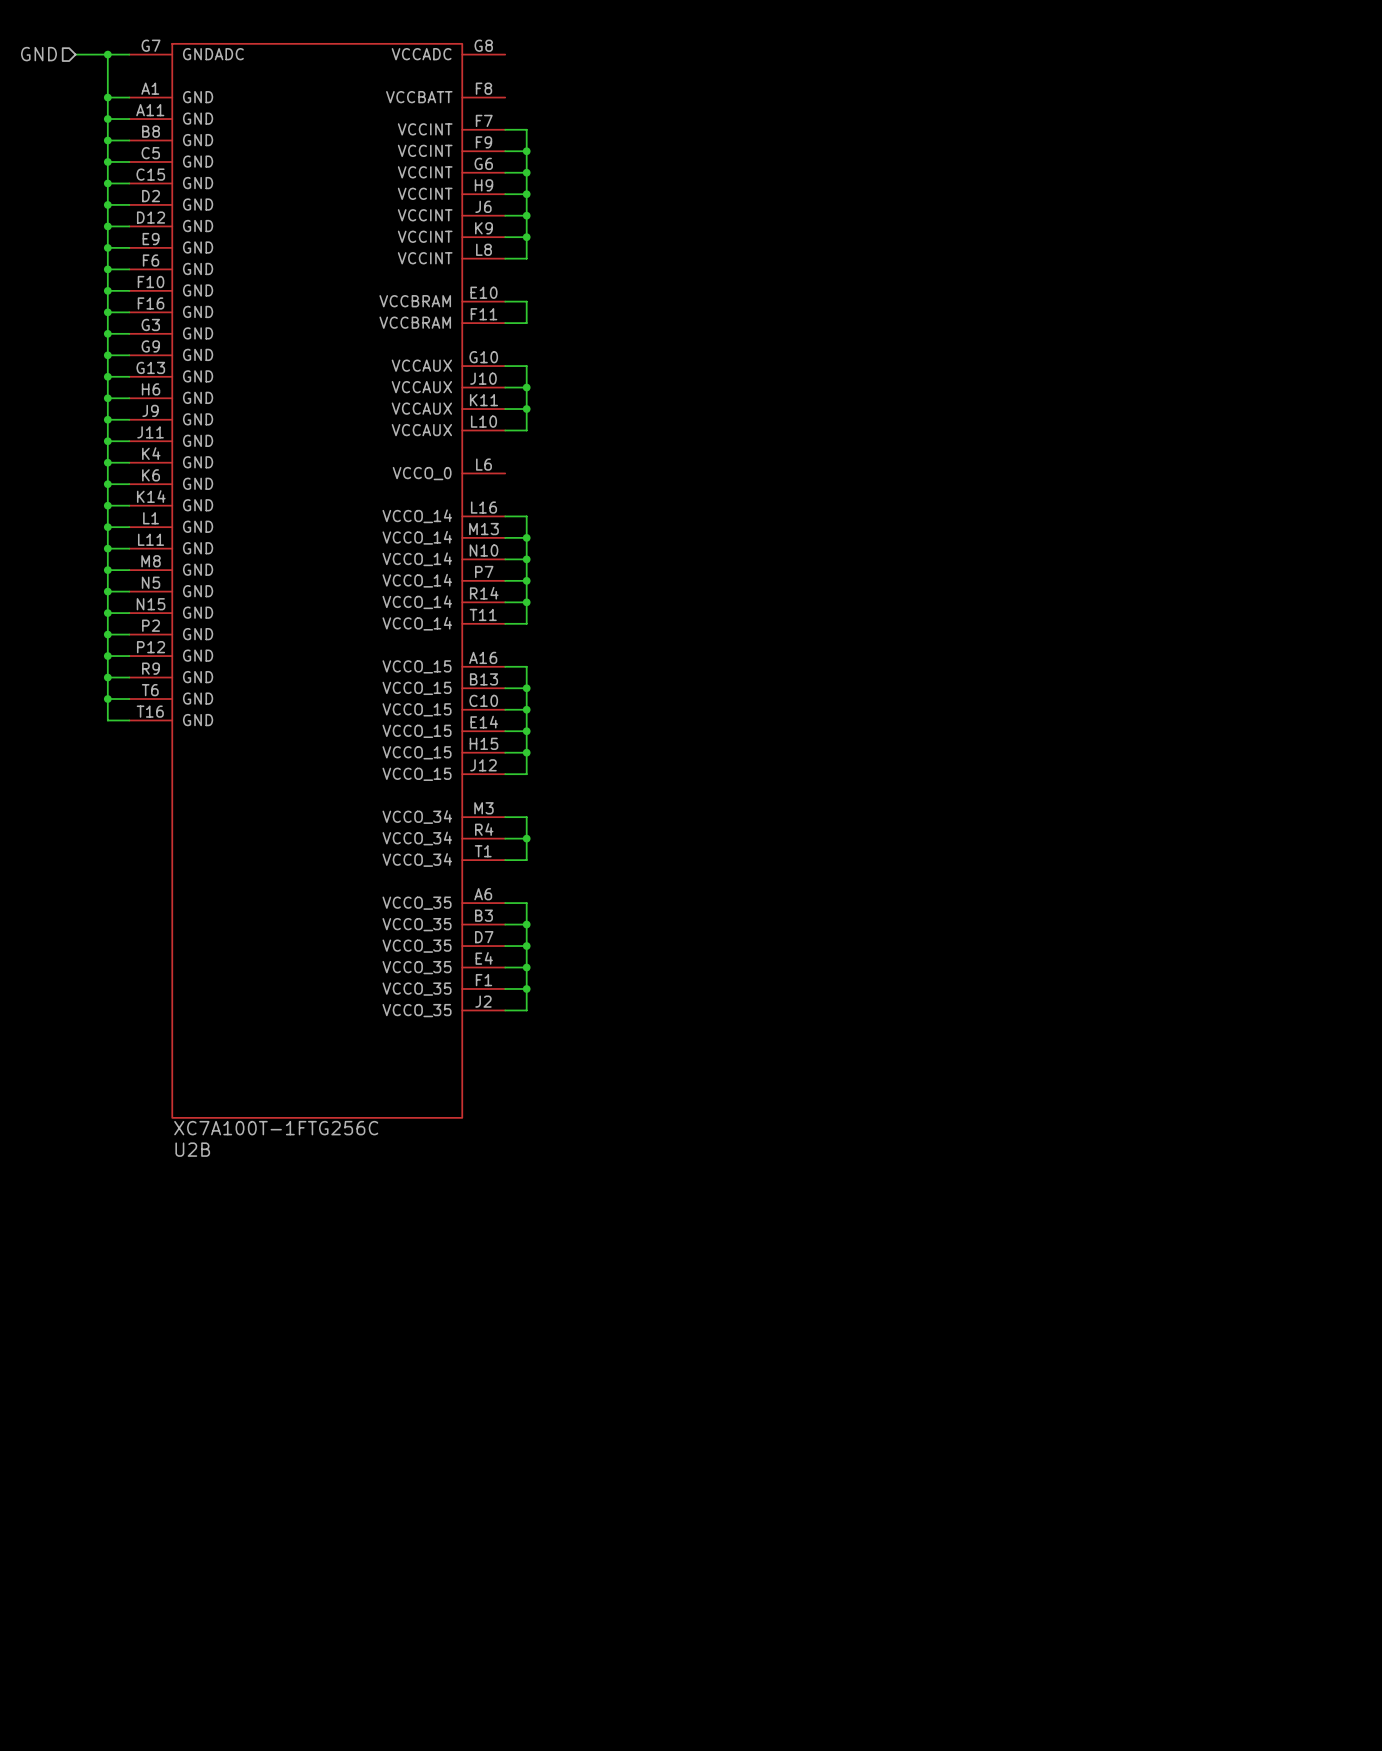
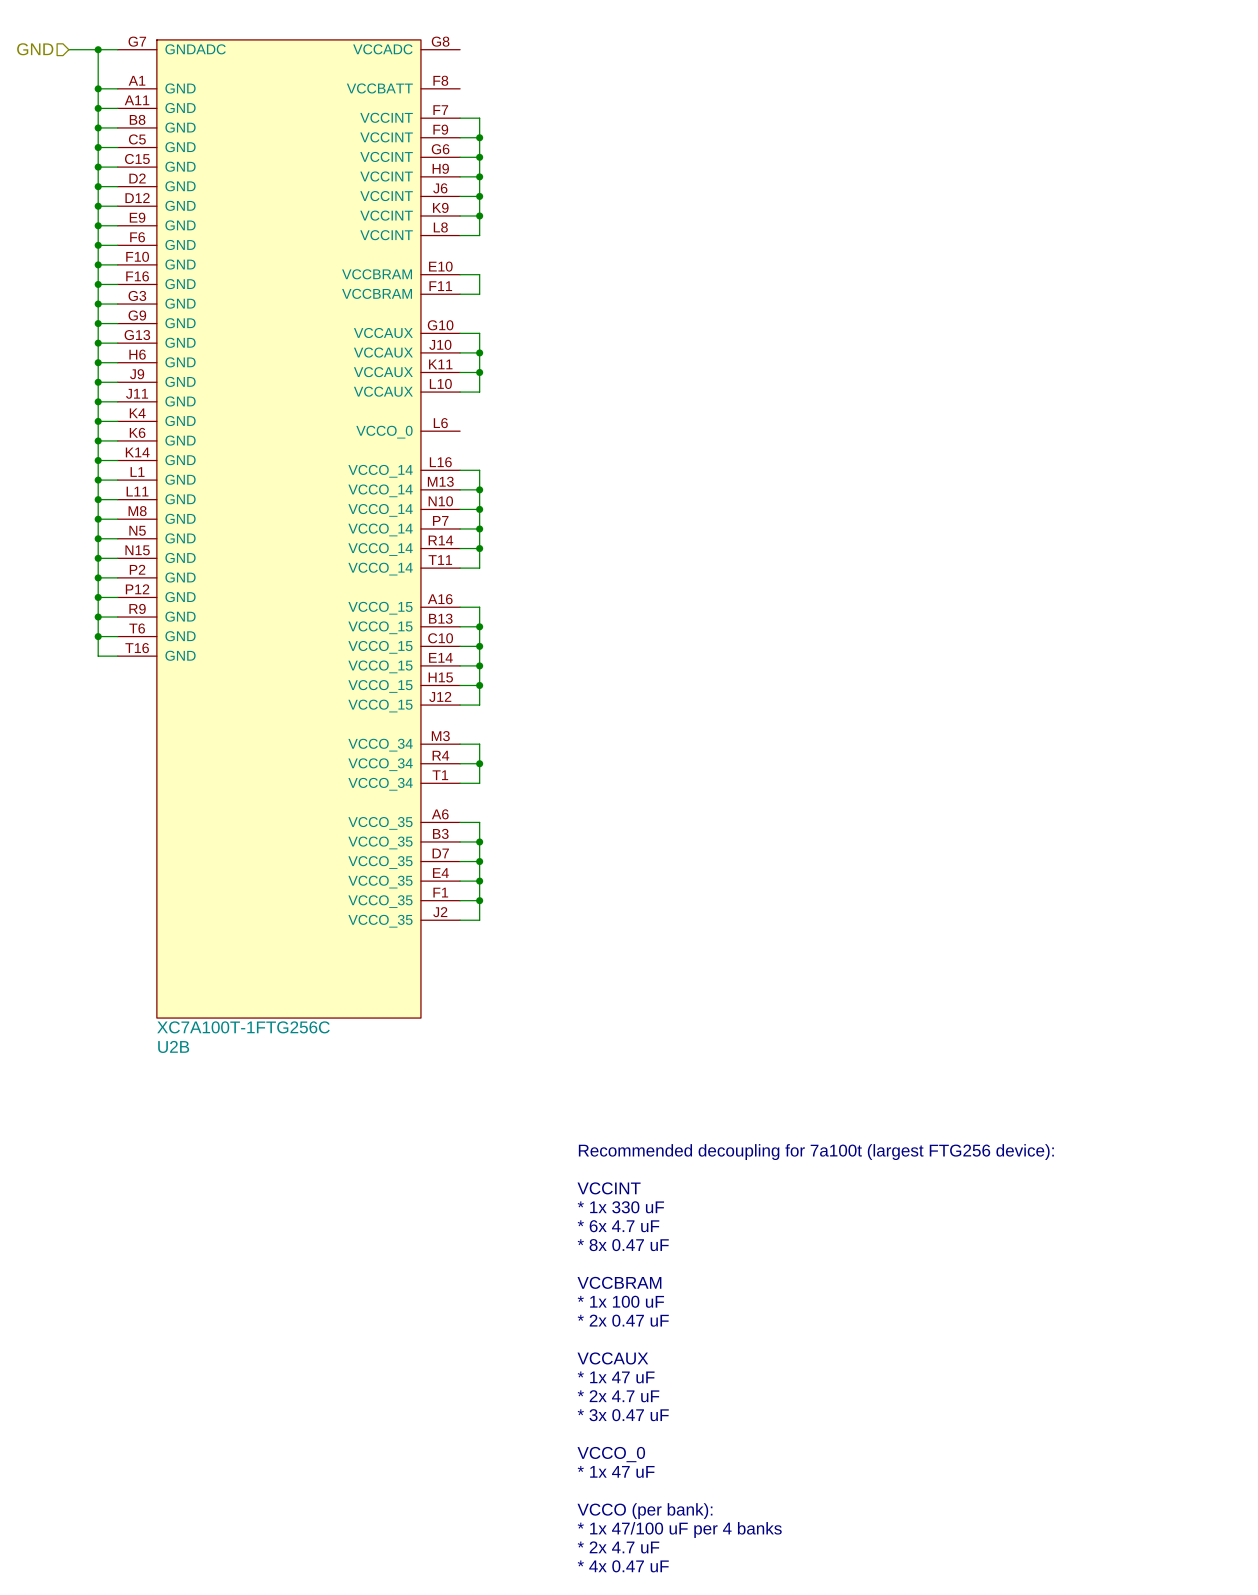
text: none -> Recommended decoupling for 7a100t (largest FTG256 device): (816, 1152)
text: none -> VCCINT (609, 1188)
text: none -> * 1x 330 uF (620, 1207)
text: none -> * 6x 4.7 uF (618, 1226)
text: none -> * 8x 0.47 uF (623, 1245)
text: none -> VCCBRAM (619, 1282)
text: none -> * 1x 100 uF (620, 1301)
text: none -> * 2x 0.47 uF (623, 1320)
text: none -> VCCAUX (612, 1358)
text: none -> * 1x 47 uF (616, 1377)
text: none -> * 2x 4.7 uF (618, 1396)
text: none -> * 3x 0.47 uF (623, 1415)
text: none -> VCCO_0 (611, 1454)
text: none -> * 1x 47 uF (616, 1471)
text: none -> VCCO (per bank): (644, 1511)
text: none -> * 1x 47/100 uF per 4 banks (679, 1529)
text: none -> * 2x 4.7 uF (618, 1547)
text: none -> * 4x 0.47 uF (623, 1566)

